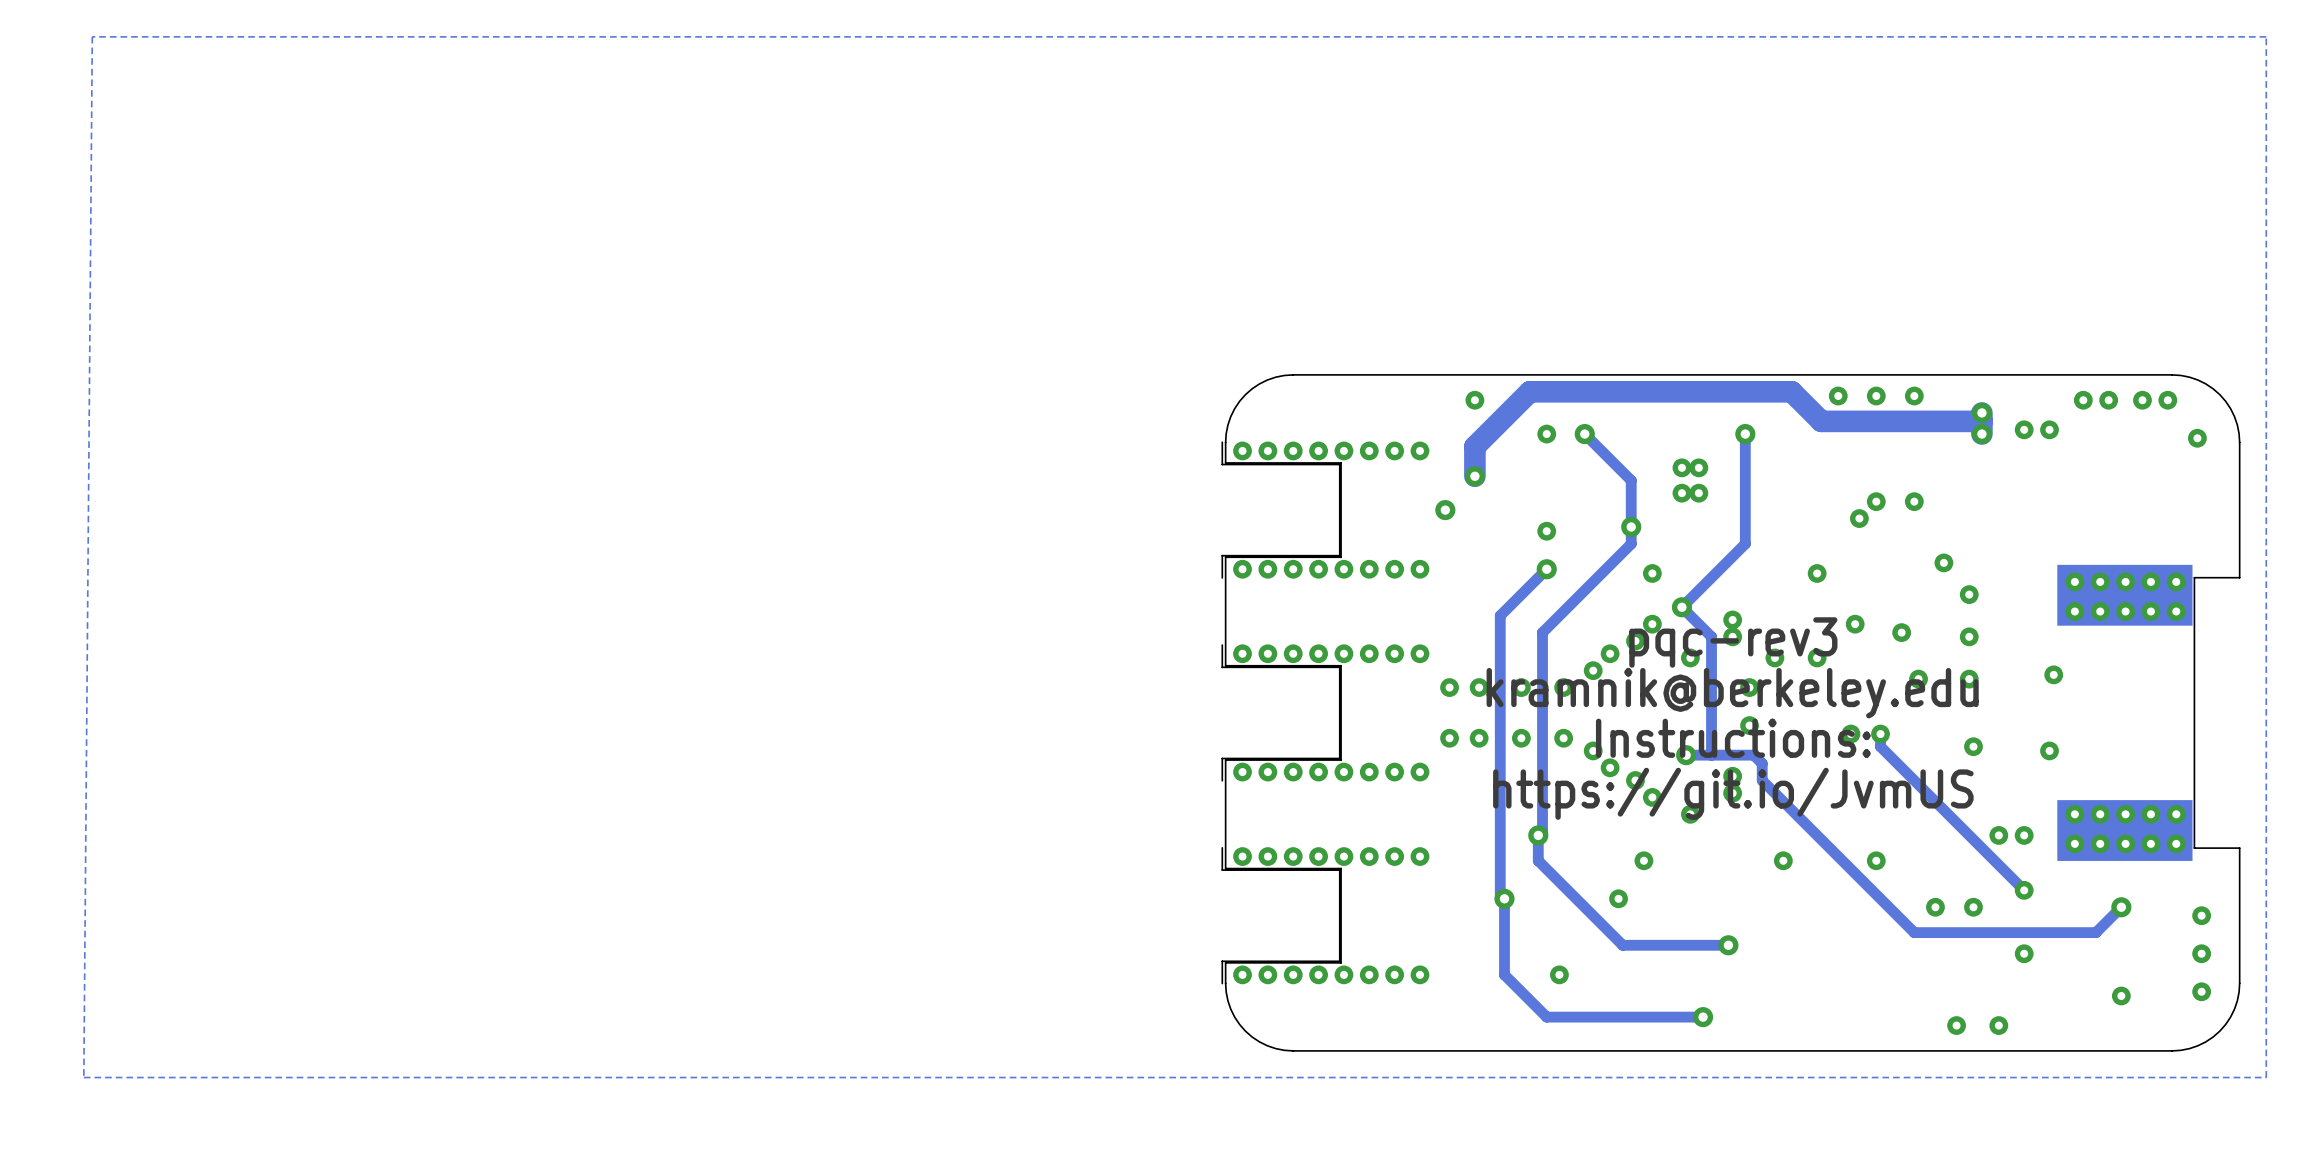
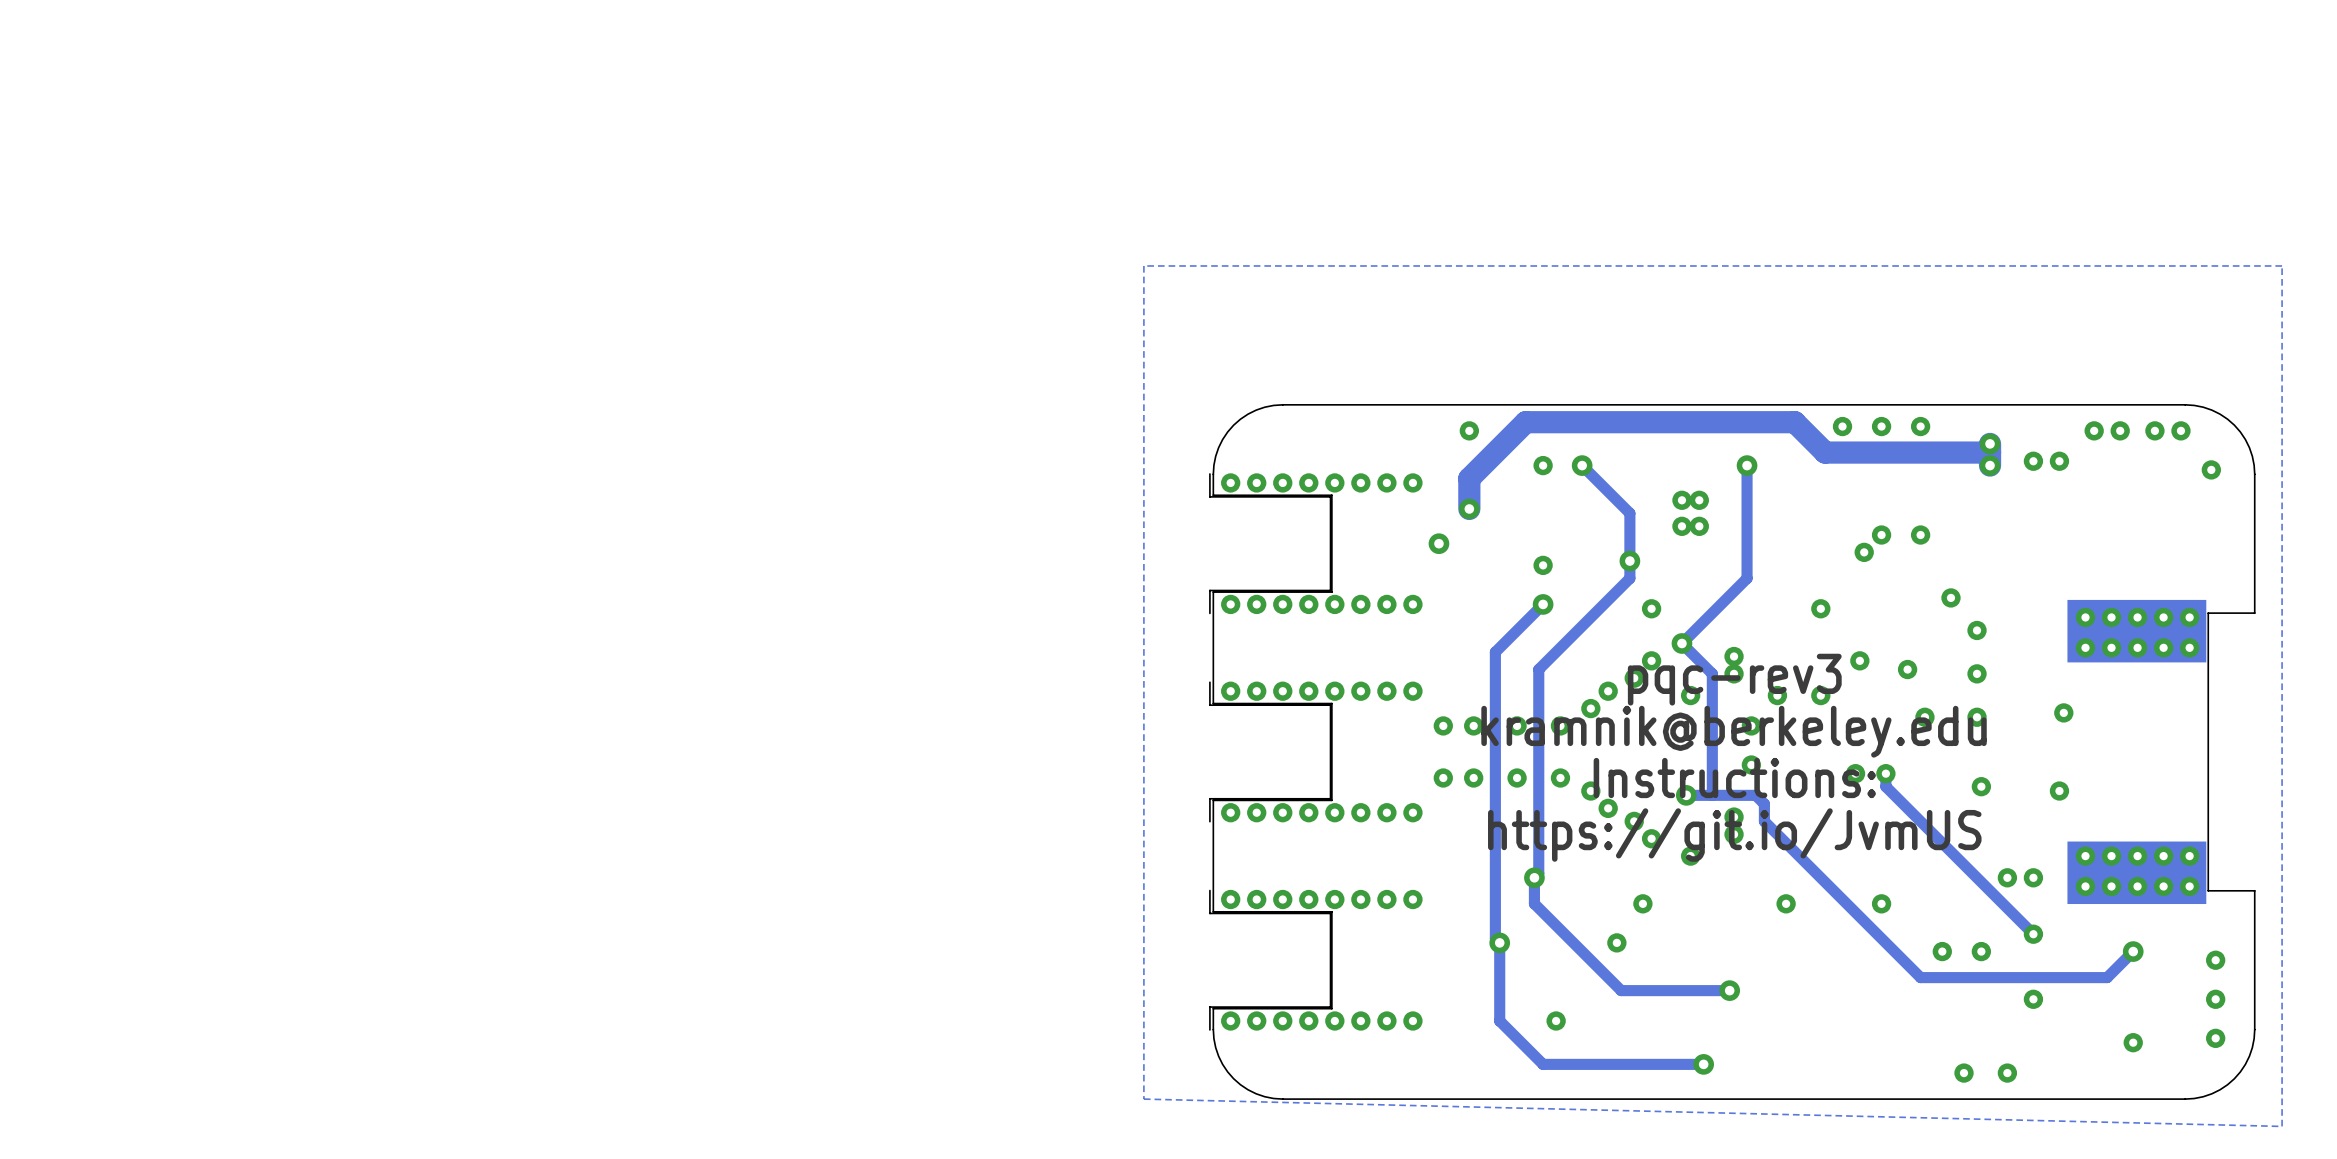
zone outline: (2266, 239) (2266, 36) (92, 36) (83, 1077) (2266, 1077) -> (2282, 265) (1143, 265) (1143, 1099) (2282, 1126)

